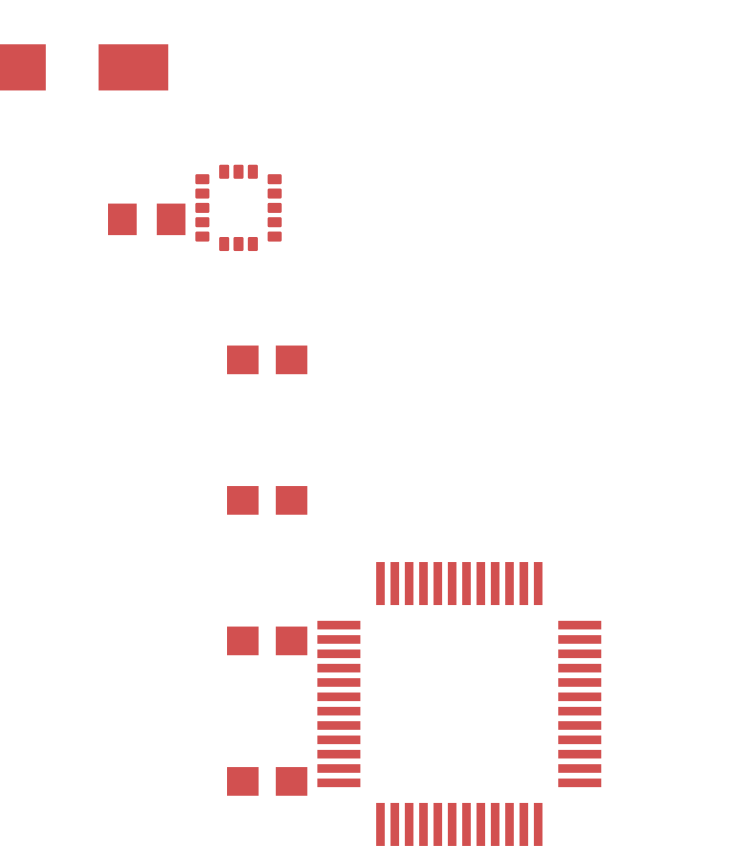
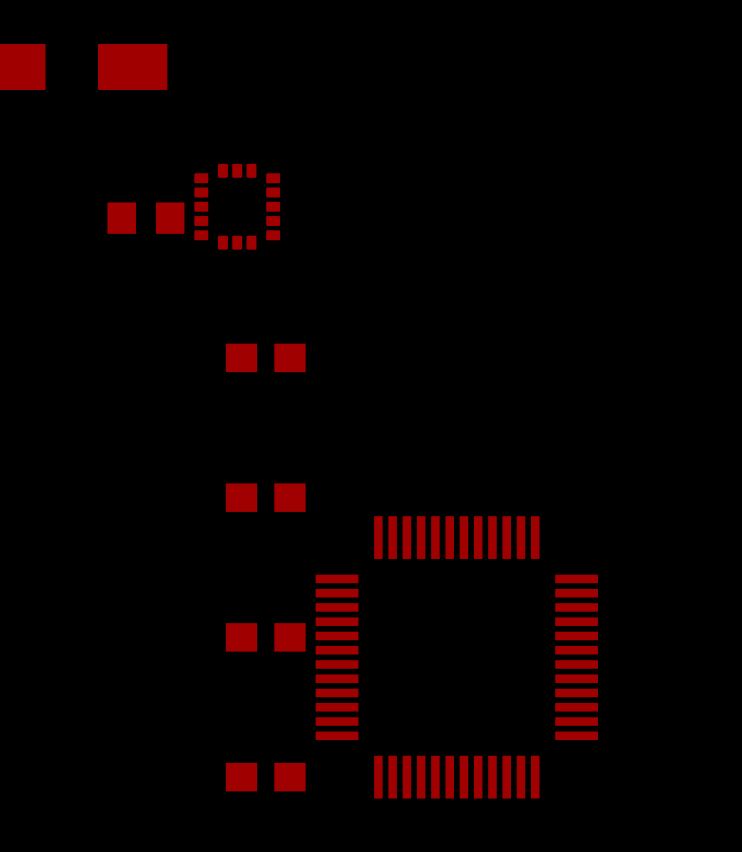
part position: (459, 703) -> (456, 657)

